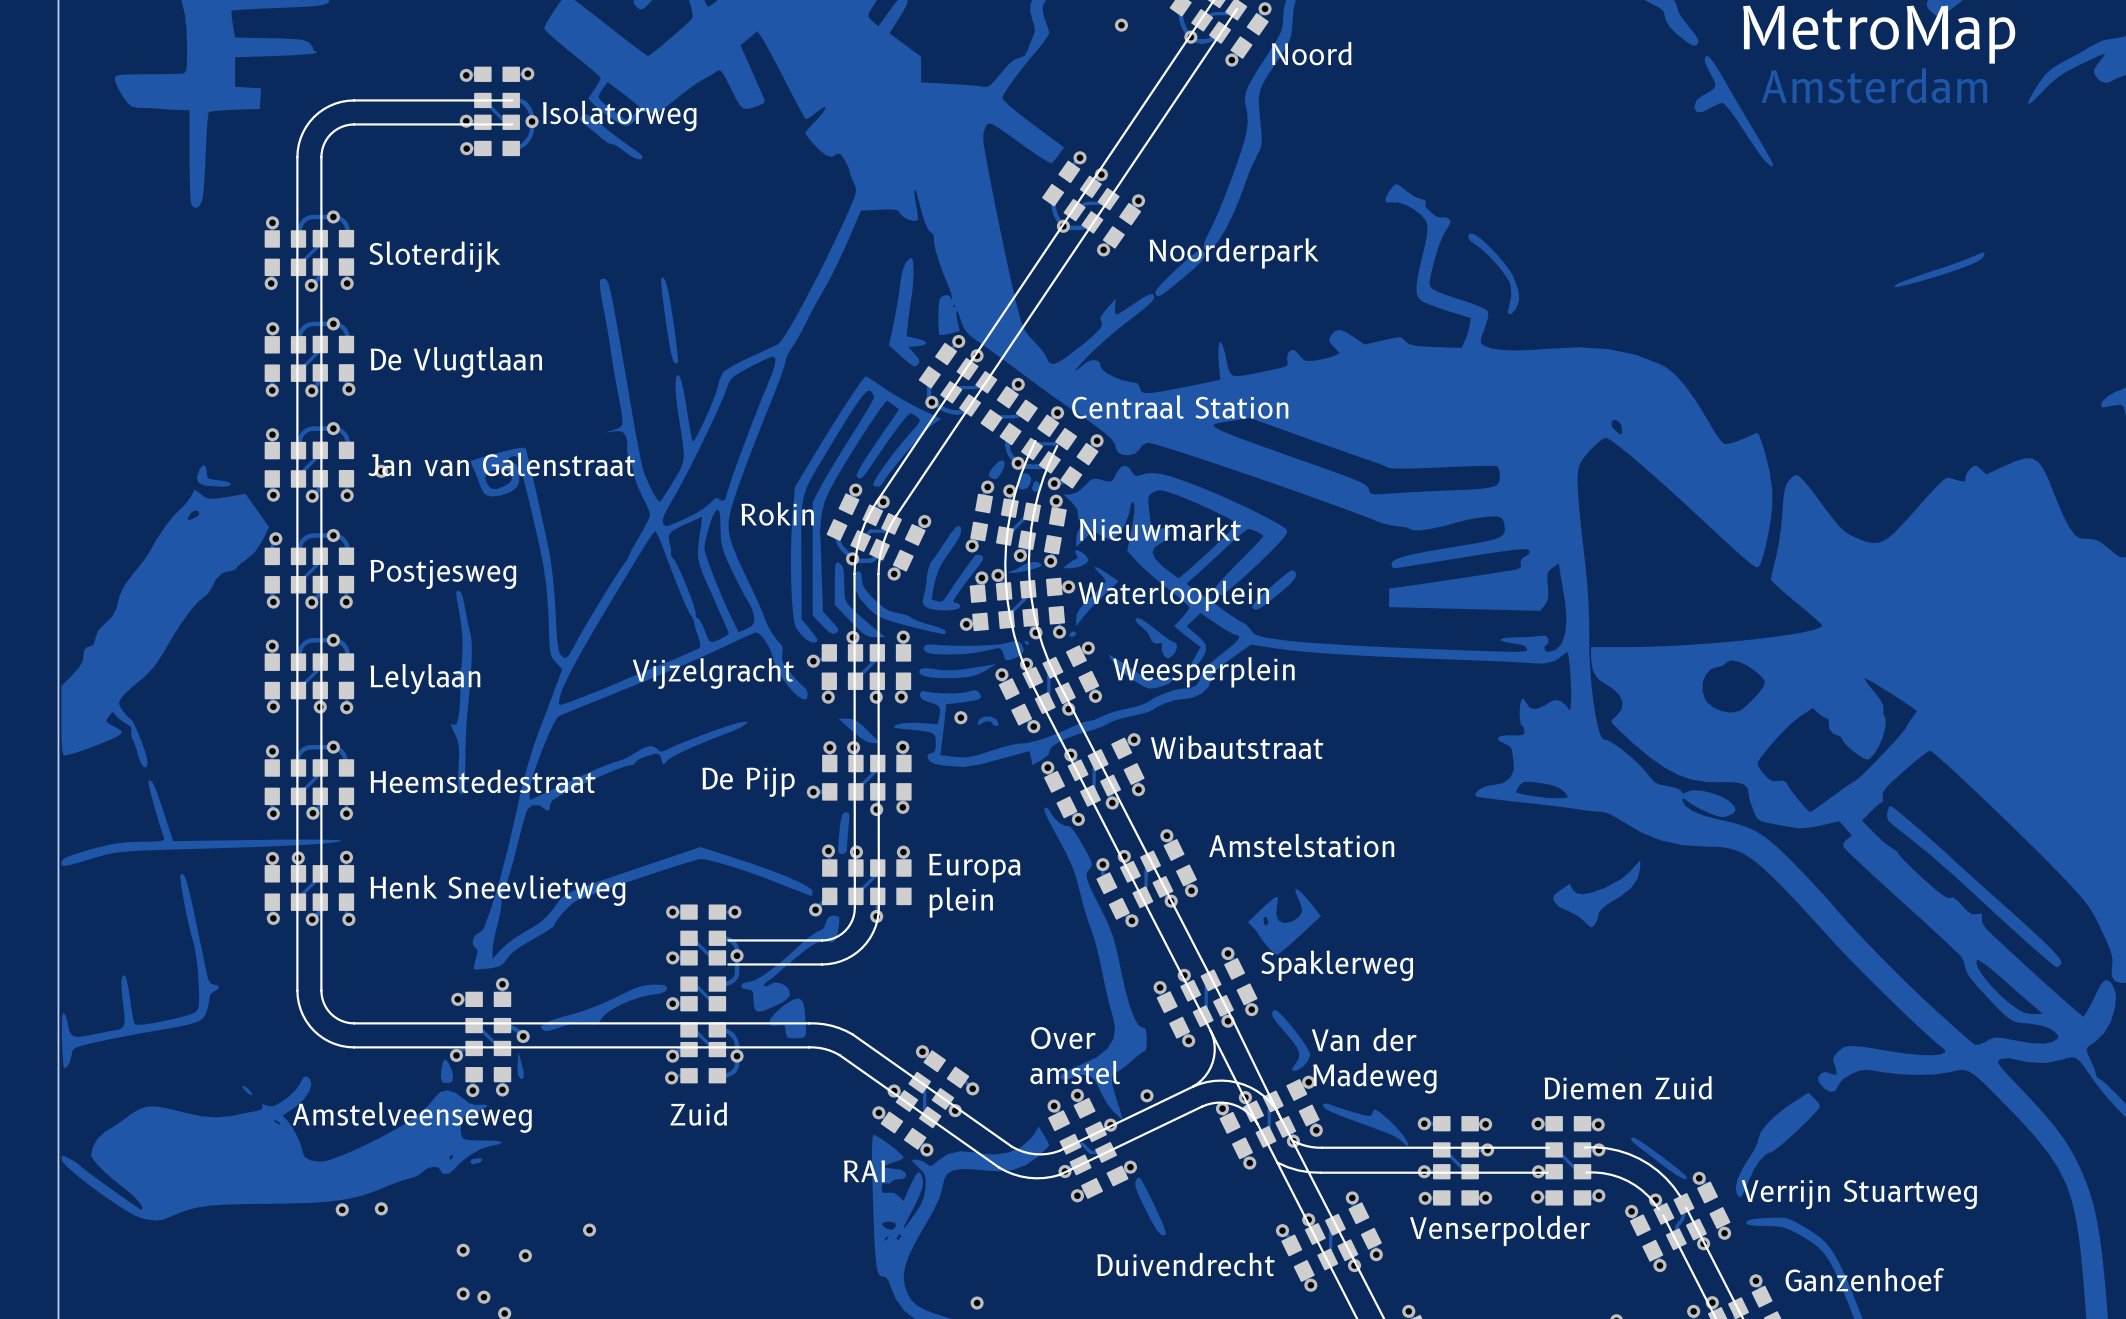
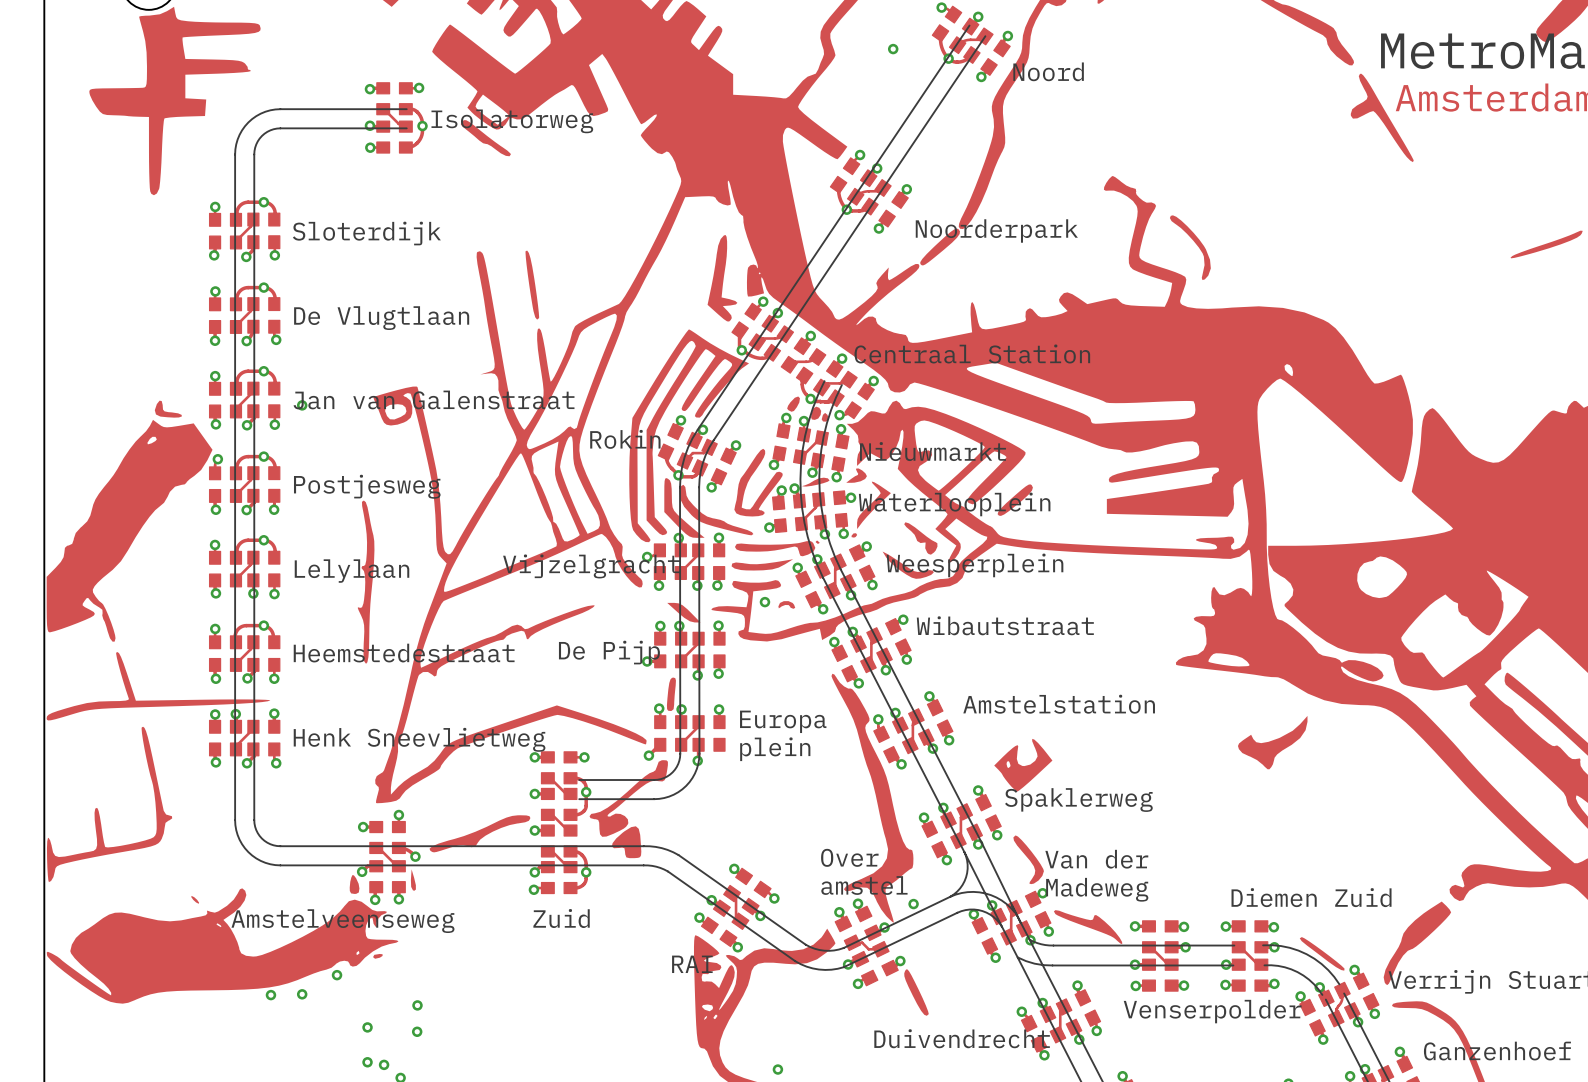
via: none -> (337, 975)
via position: (589, 1230) -> (417, 1005)

